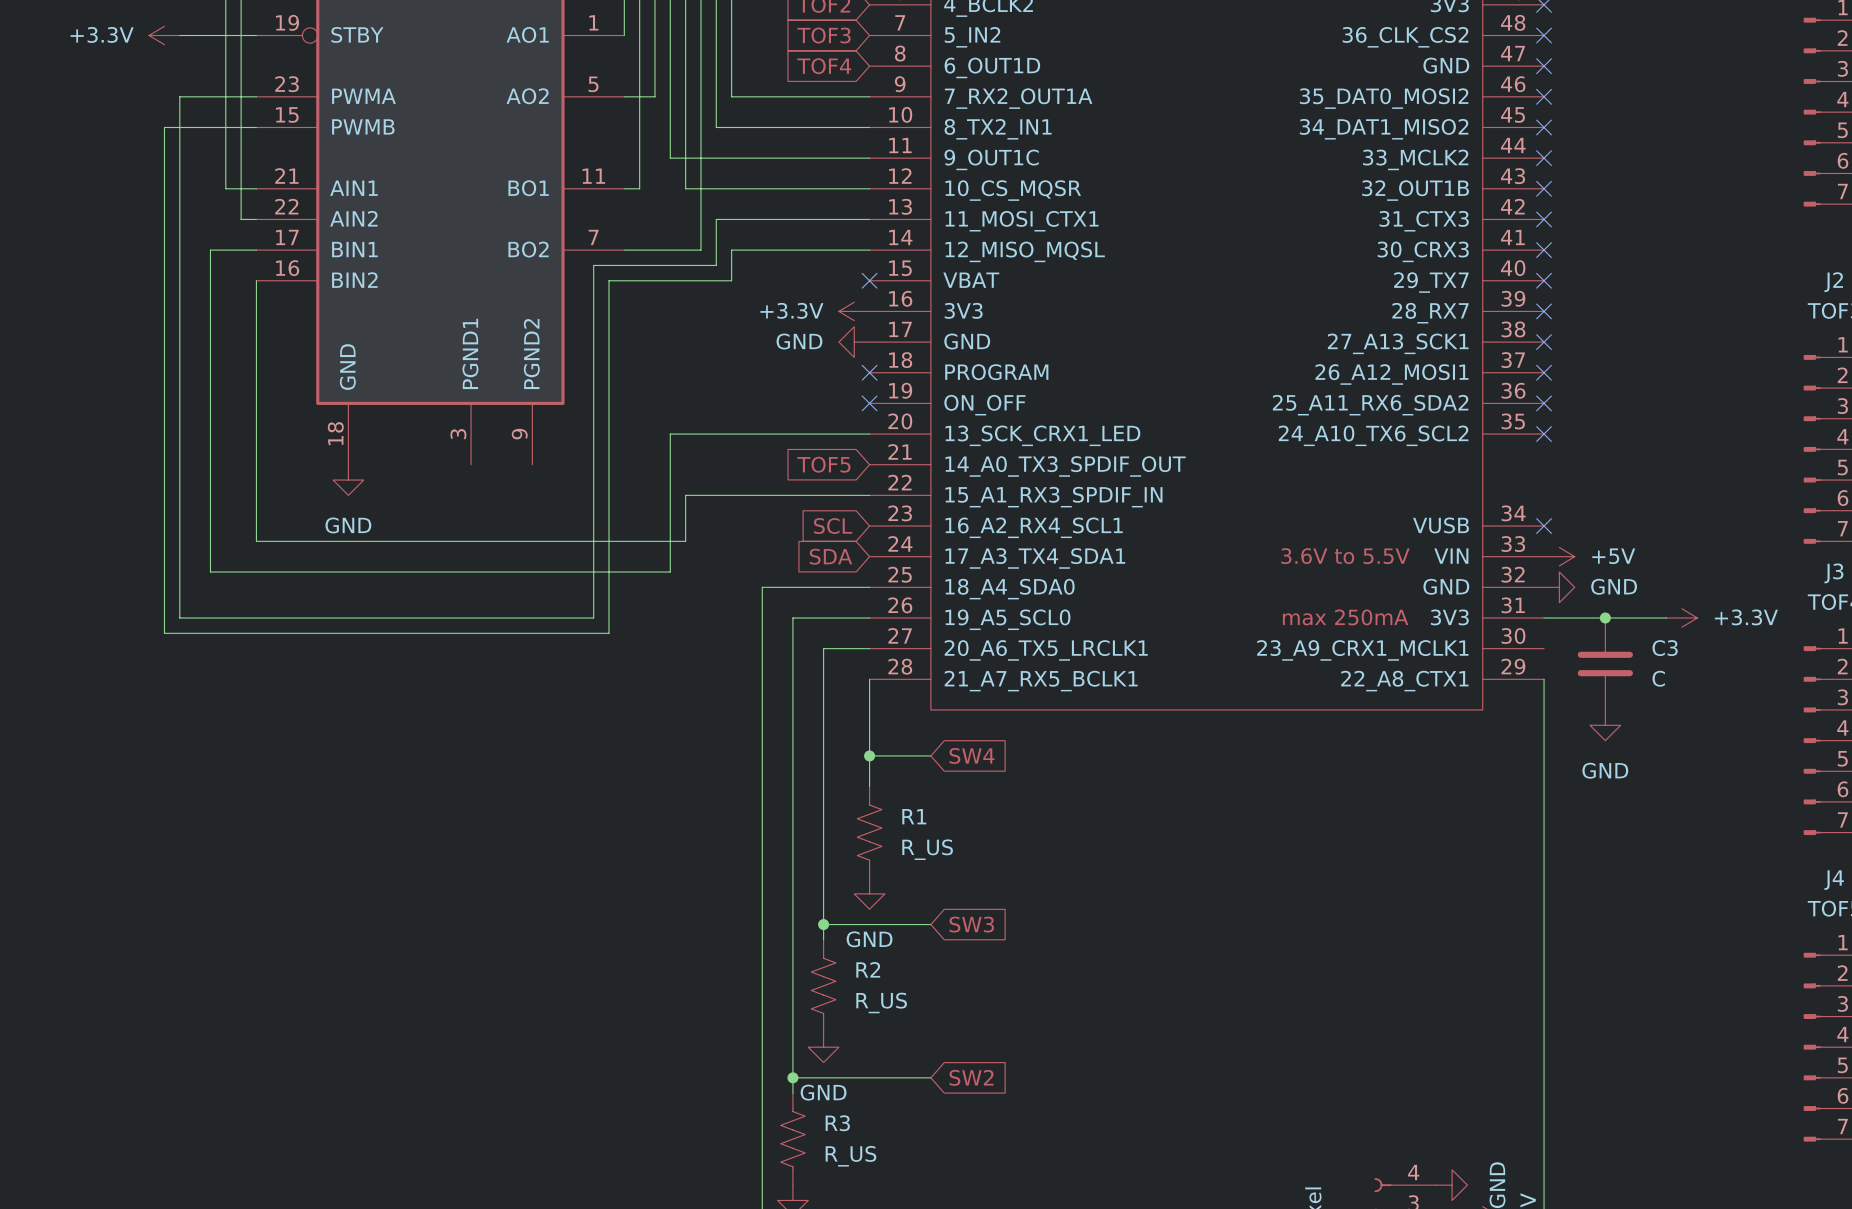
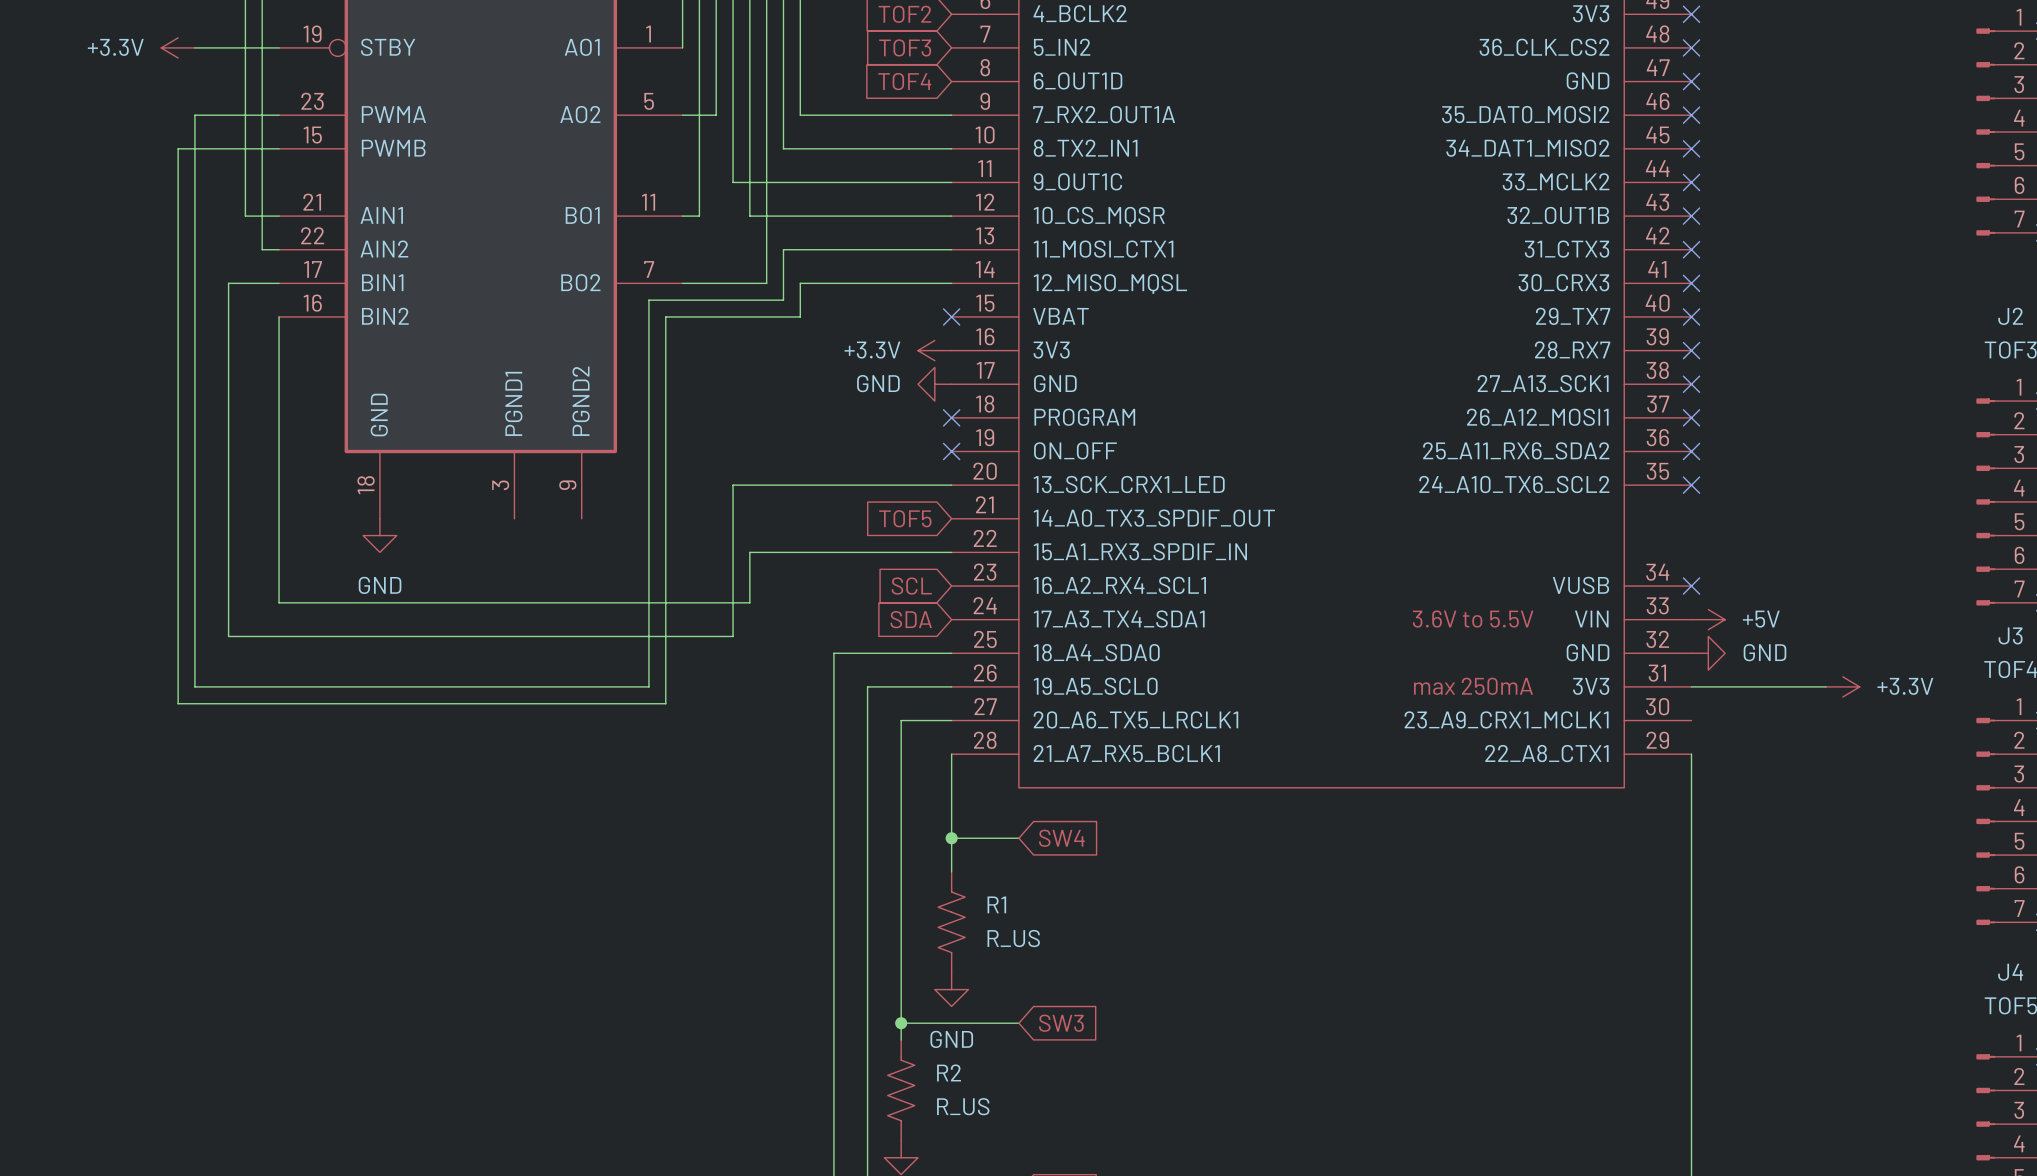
junction: (1605, 617) -> none
C3: C (1605, 663) -> none
power symbol: GND (1605, 725) -> none

